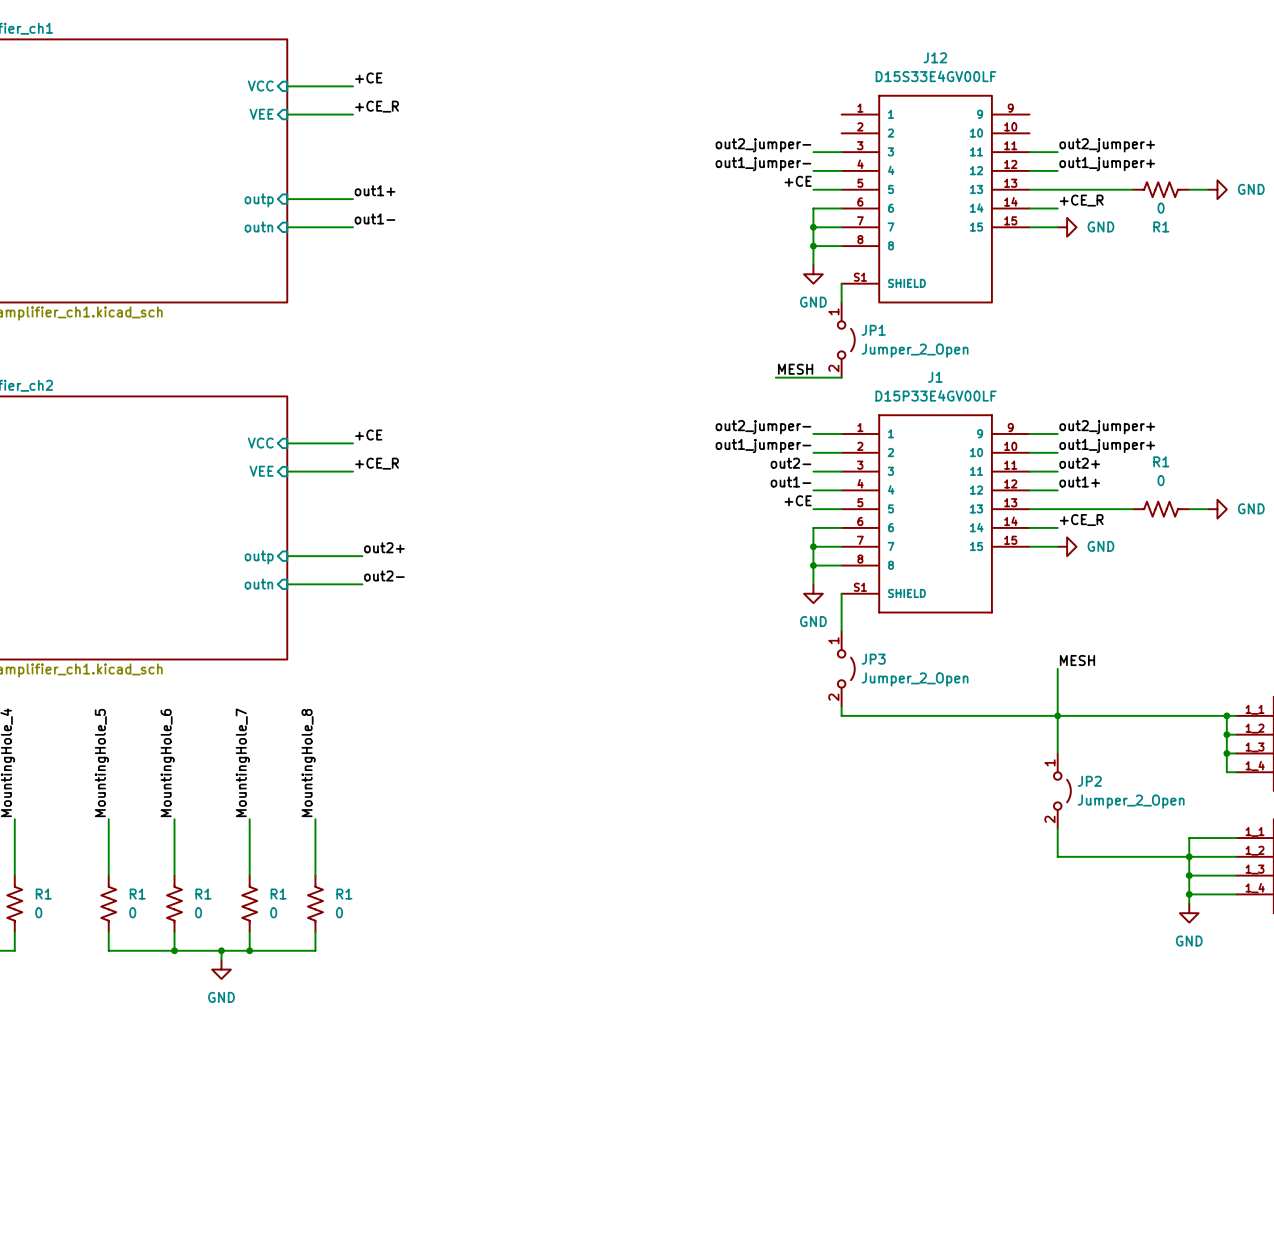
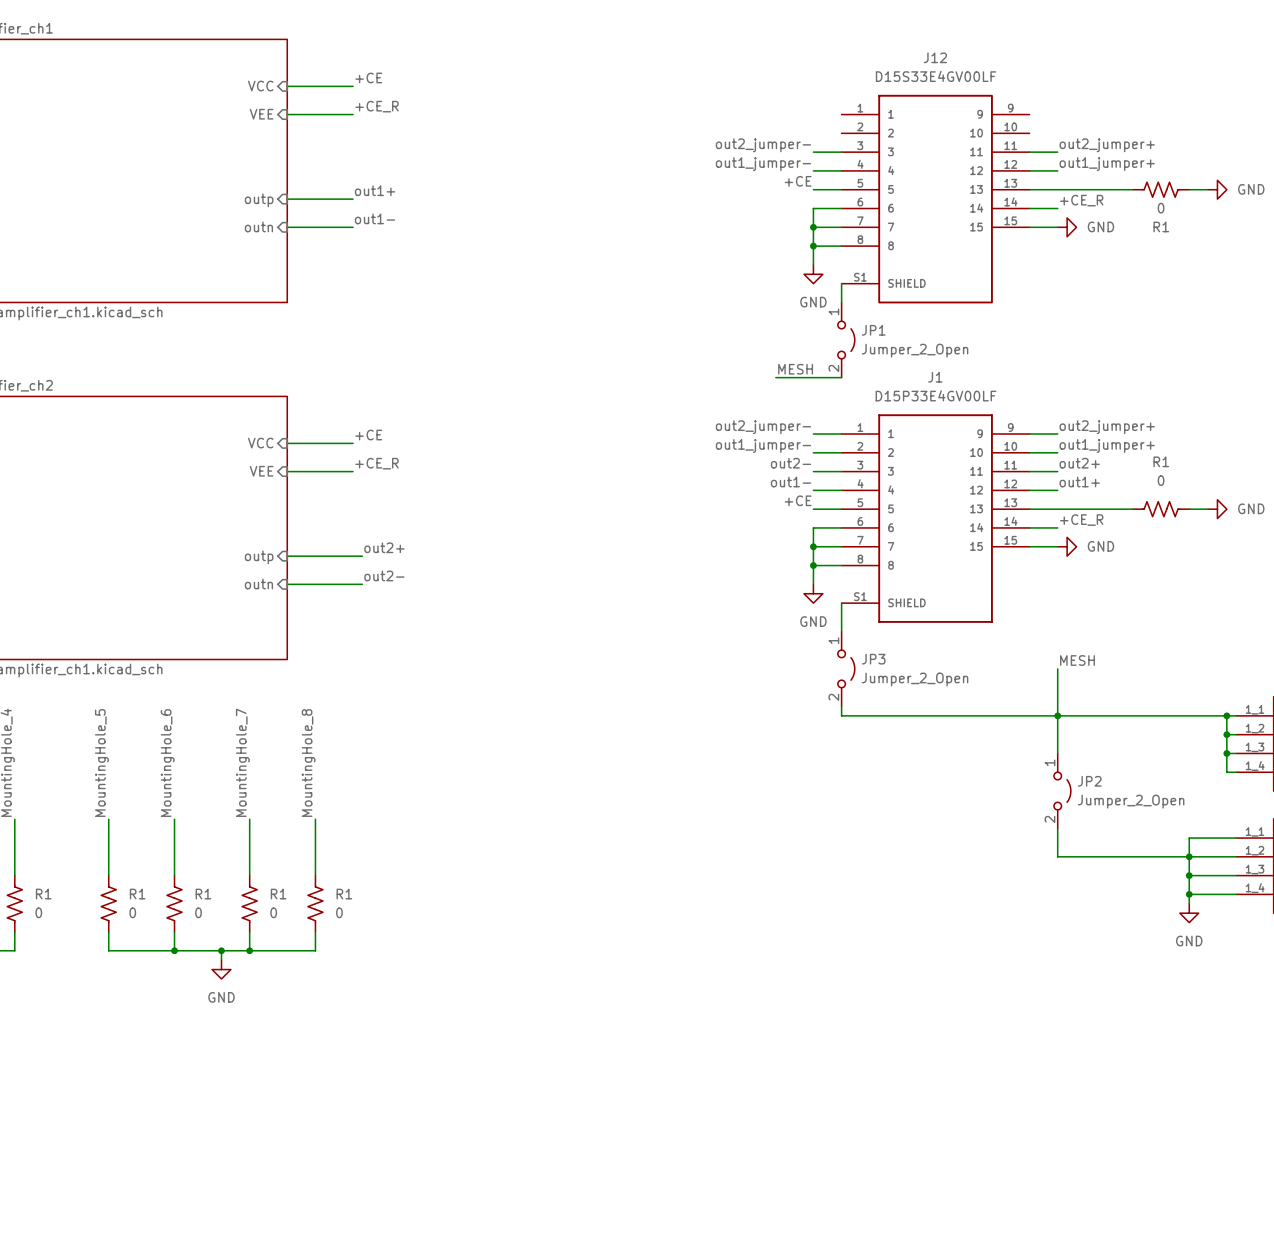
J1 symbol: [841, 414, 1030, 614] -> [841, 414, 1030, 623]
wire: (841, 593) (841, 603) -> none

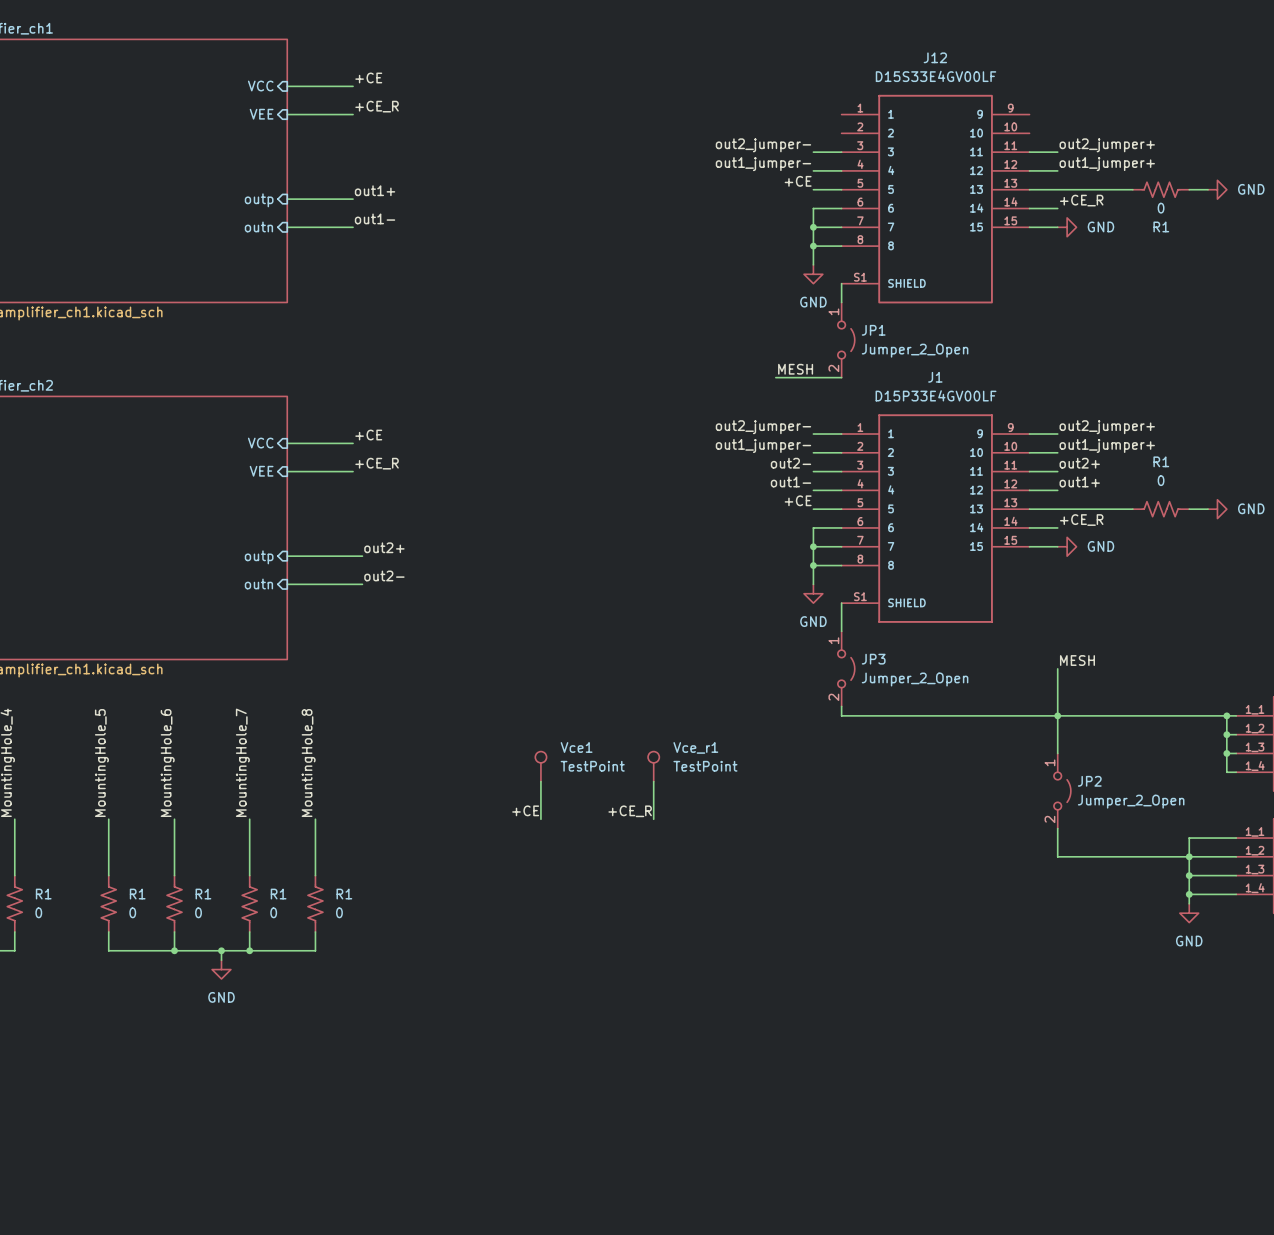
Vce1: none -> TestPoint (540, 766)
Vce_r1: none -> TestPoint (653, 766)
wire: none -> (540, 781) (540, 819)
wire: none -> (653, 781) (653, 819)
label: none -> +CE (525, 810)
label: none -> +CE_R (630, 811)

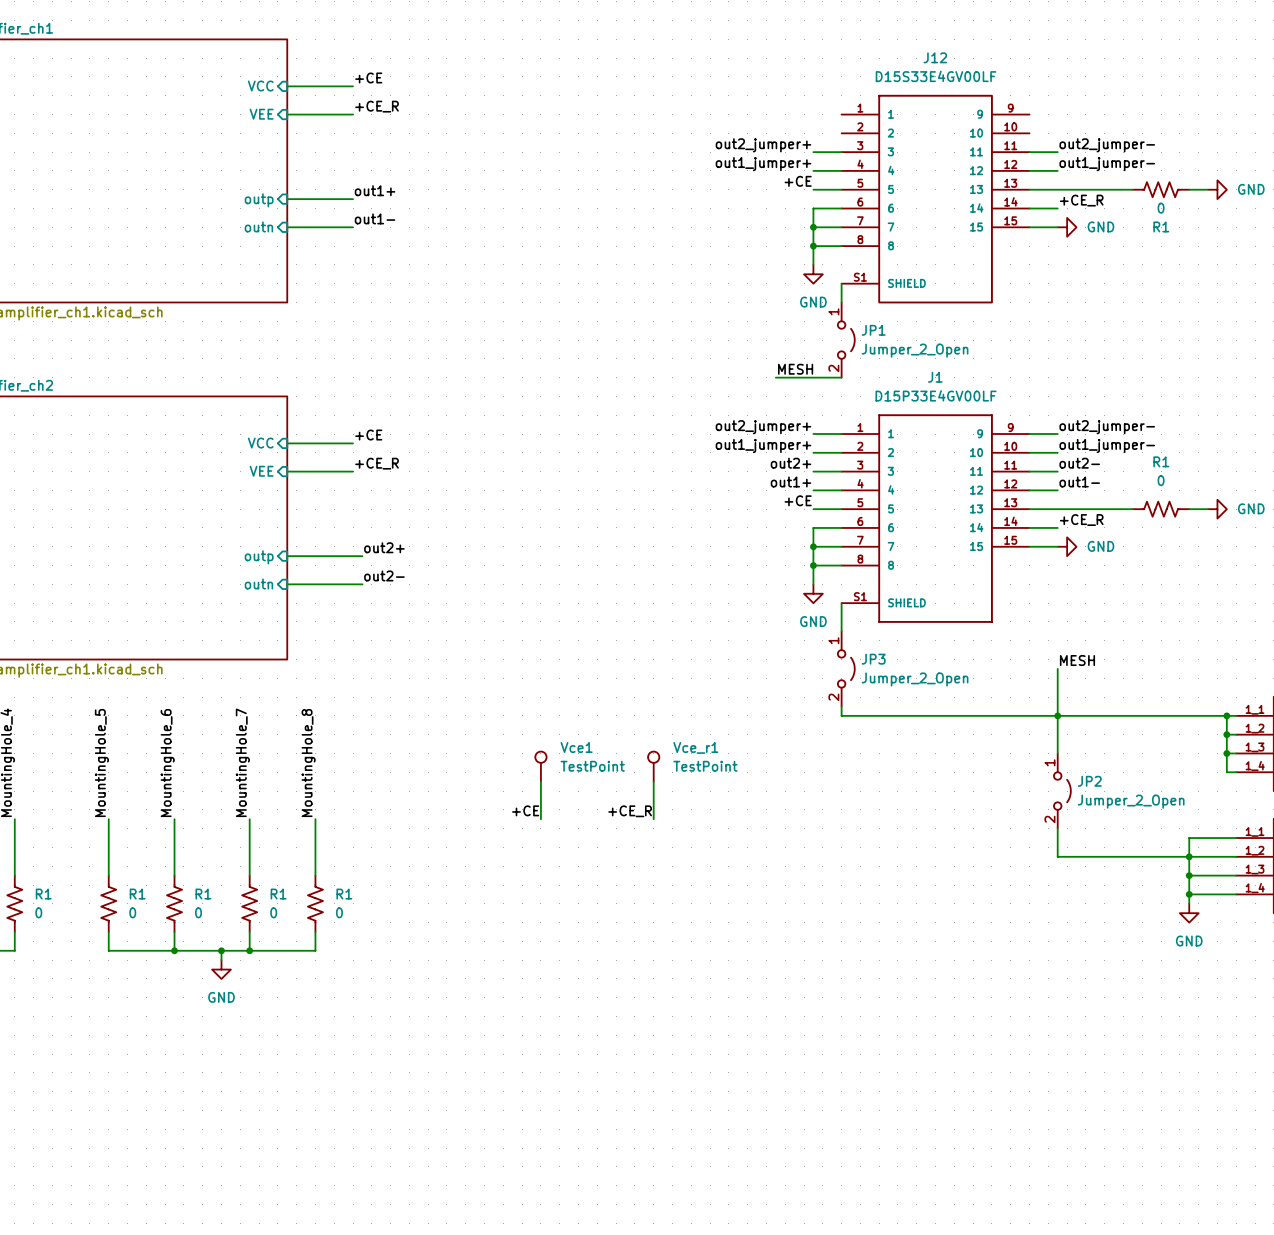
label: out2_jumper- (763, 145) -> out2_jumper+ (763, 145)
label: out2_jumper+ (1107, 145) -> out2_jumper- (1107, 145)
label: out1_jumper- (763, 164) -> out1_jumper+ (763, 164)
label: out1_jumper+ (1107, 164) -> out1_jumper- (1107, 164)
label: out2_jumper- (763, 427) -> out2_jumper+ (763, 427)
label: out2_jumper+ (1107, 427) -> out2_jumper- (1107, 427)
label: out1_jumper- (763, 445) -> out1_jumper+ (763, 445)
label: out1_jumper+ (1107, 445) -> out1_jumper- (1107, 445)
label: out2- (790, 463) -> out2+ (790, 463)
label: out2+ (1079, 463) -> out2- (1079, 463)
label: out1- (790, 482) -> out1+ (790, 482)
label: out1+ (1079, 482) -> out1- (1079, 482)

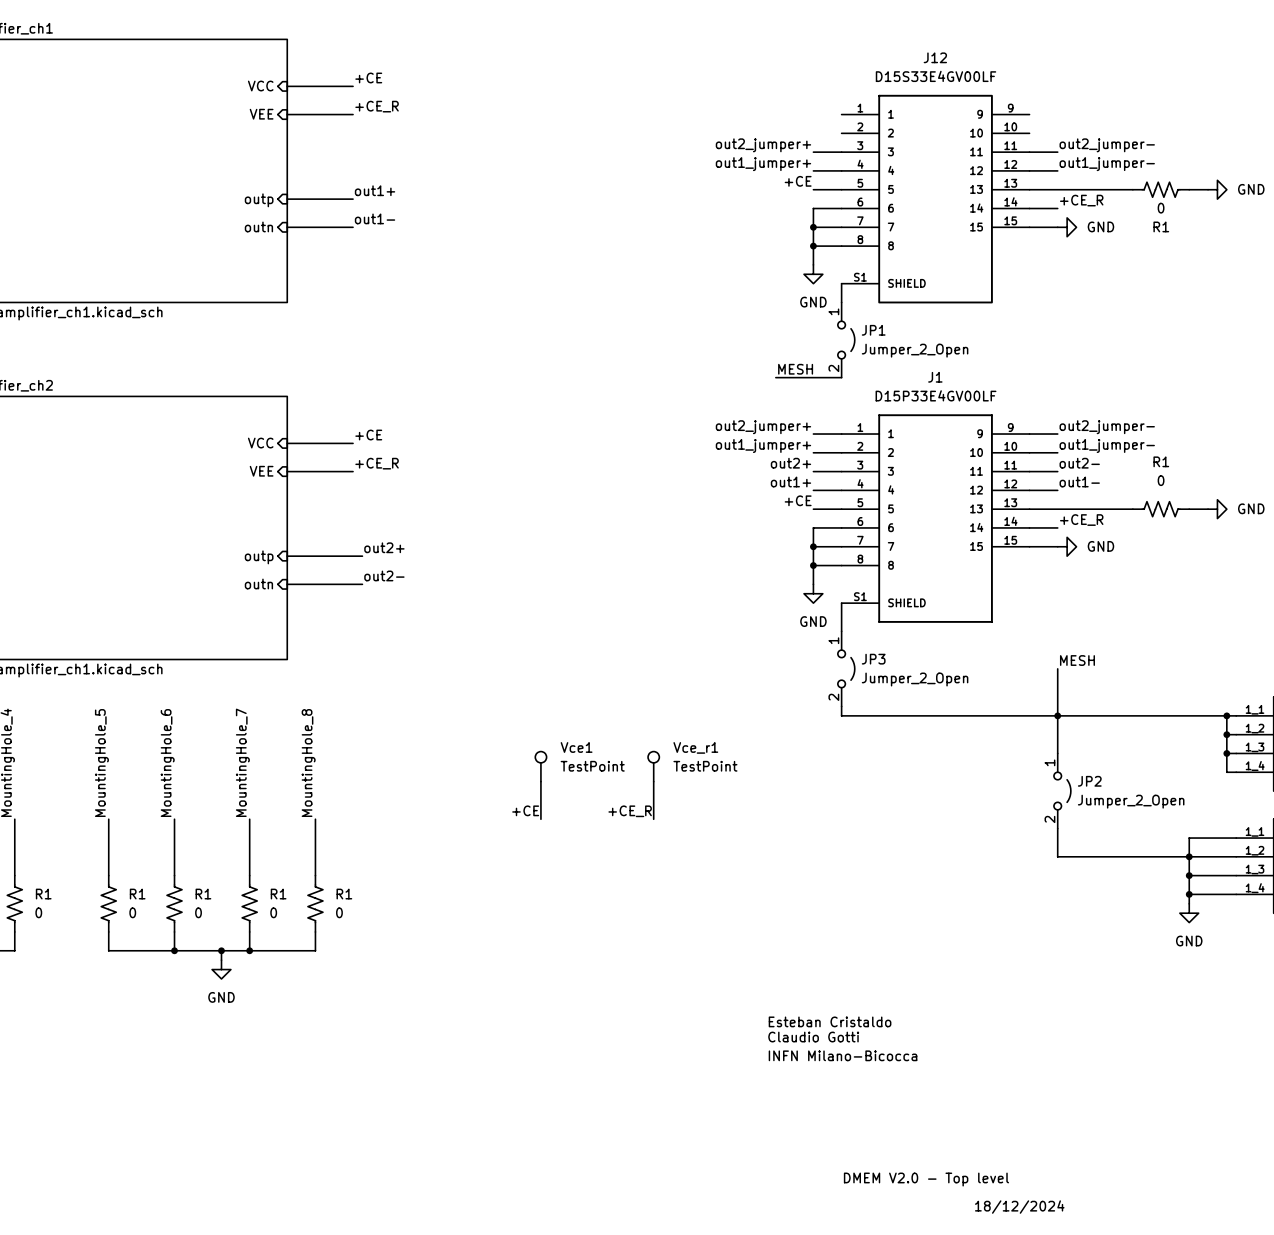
text: none -> Esteban Cristaldo (830, 1021)
text: none -> Claudio Gotti (813, 1037)
text: none -> INFN Milano-Bicocca (843, 1055)
text: none -> DMEM V2.0 - Top level (926, 1179)
text: none -> 18/12/2024 (1019, 1207)

